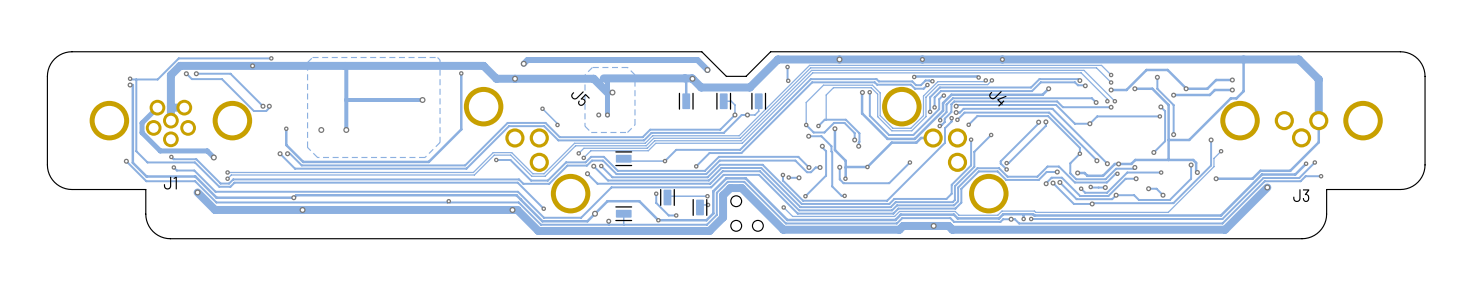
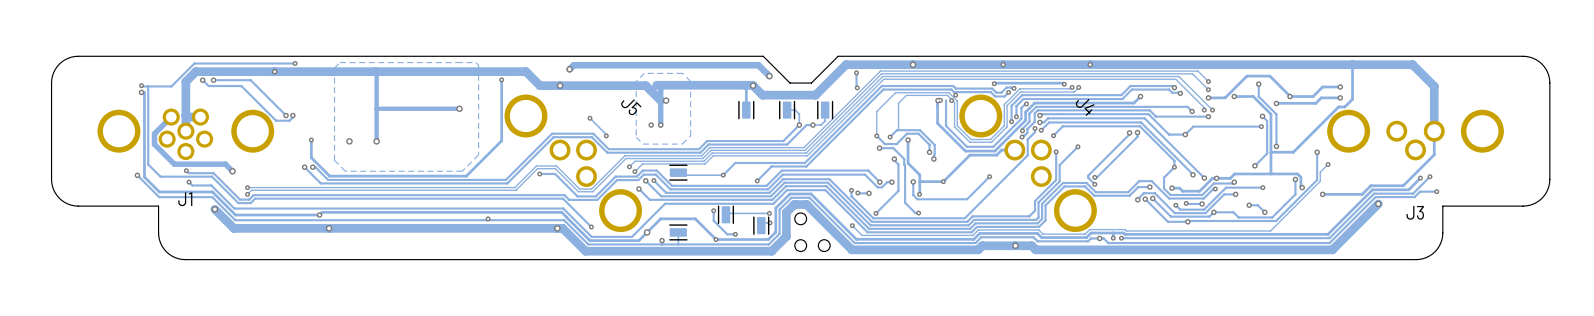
via: none -> (955, 95)
via: none -> (940, 100)
via: (869, 92) -> none
via: none -> (951, 100)

